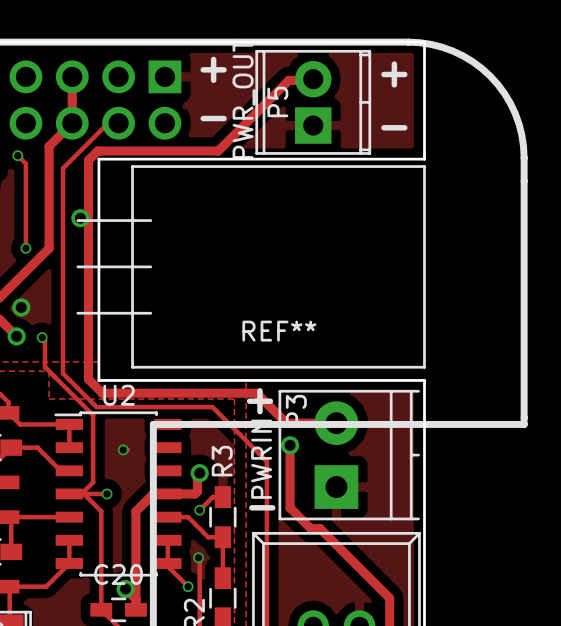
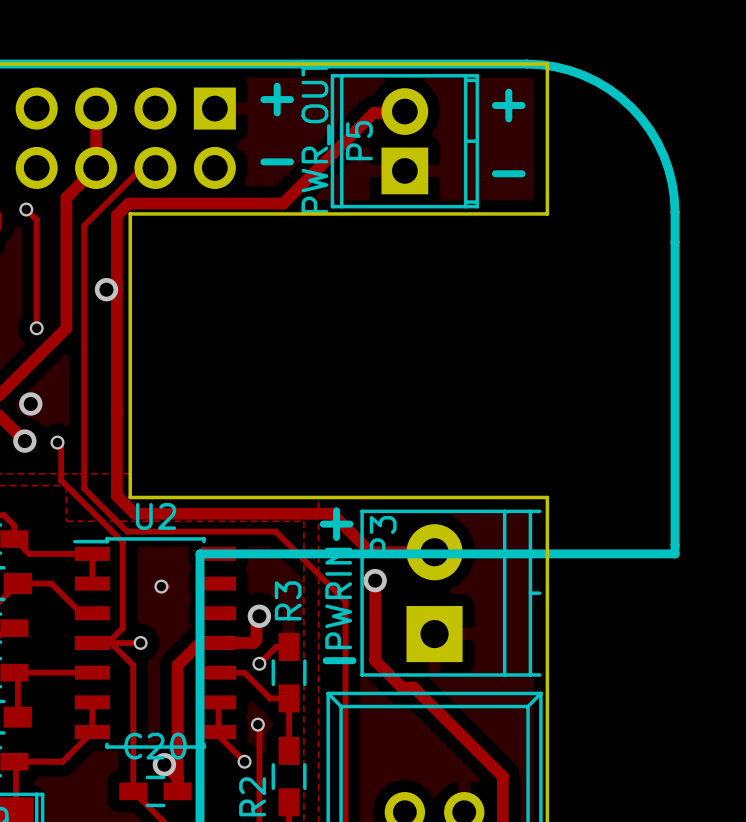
REF**: (251, 266) -> none

